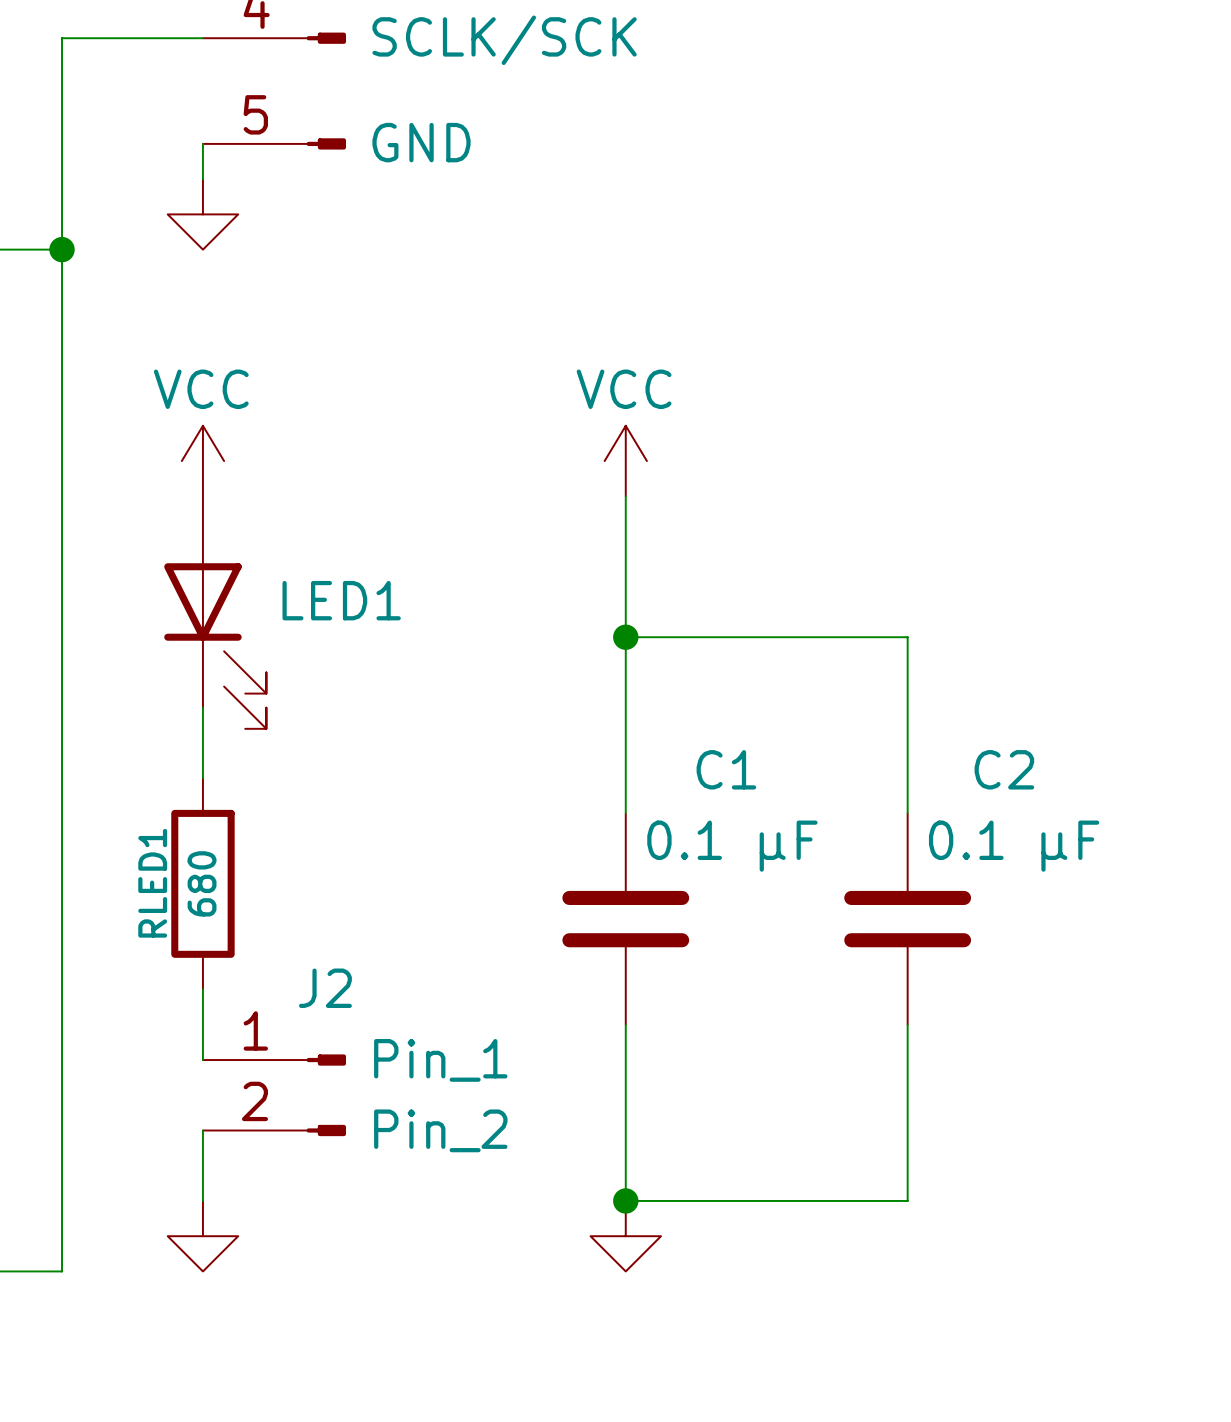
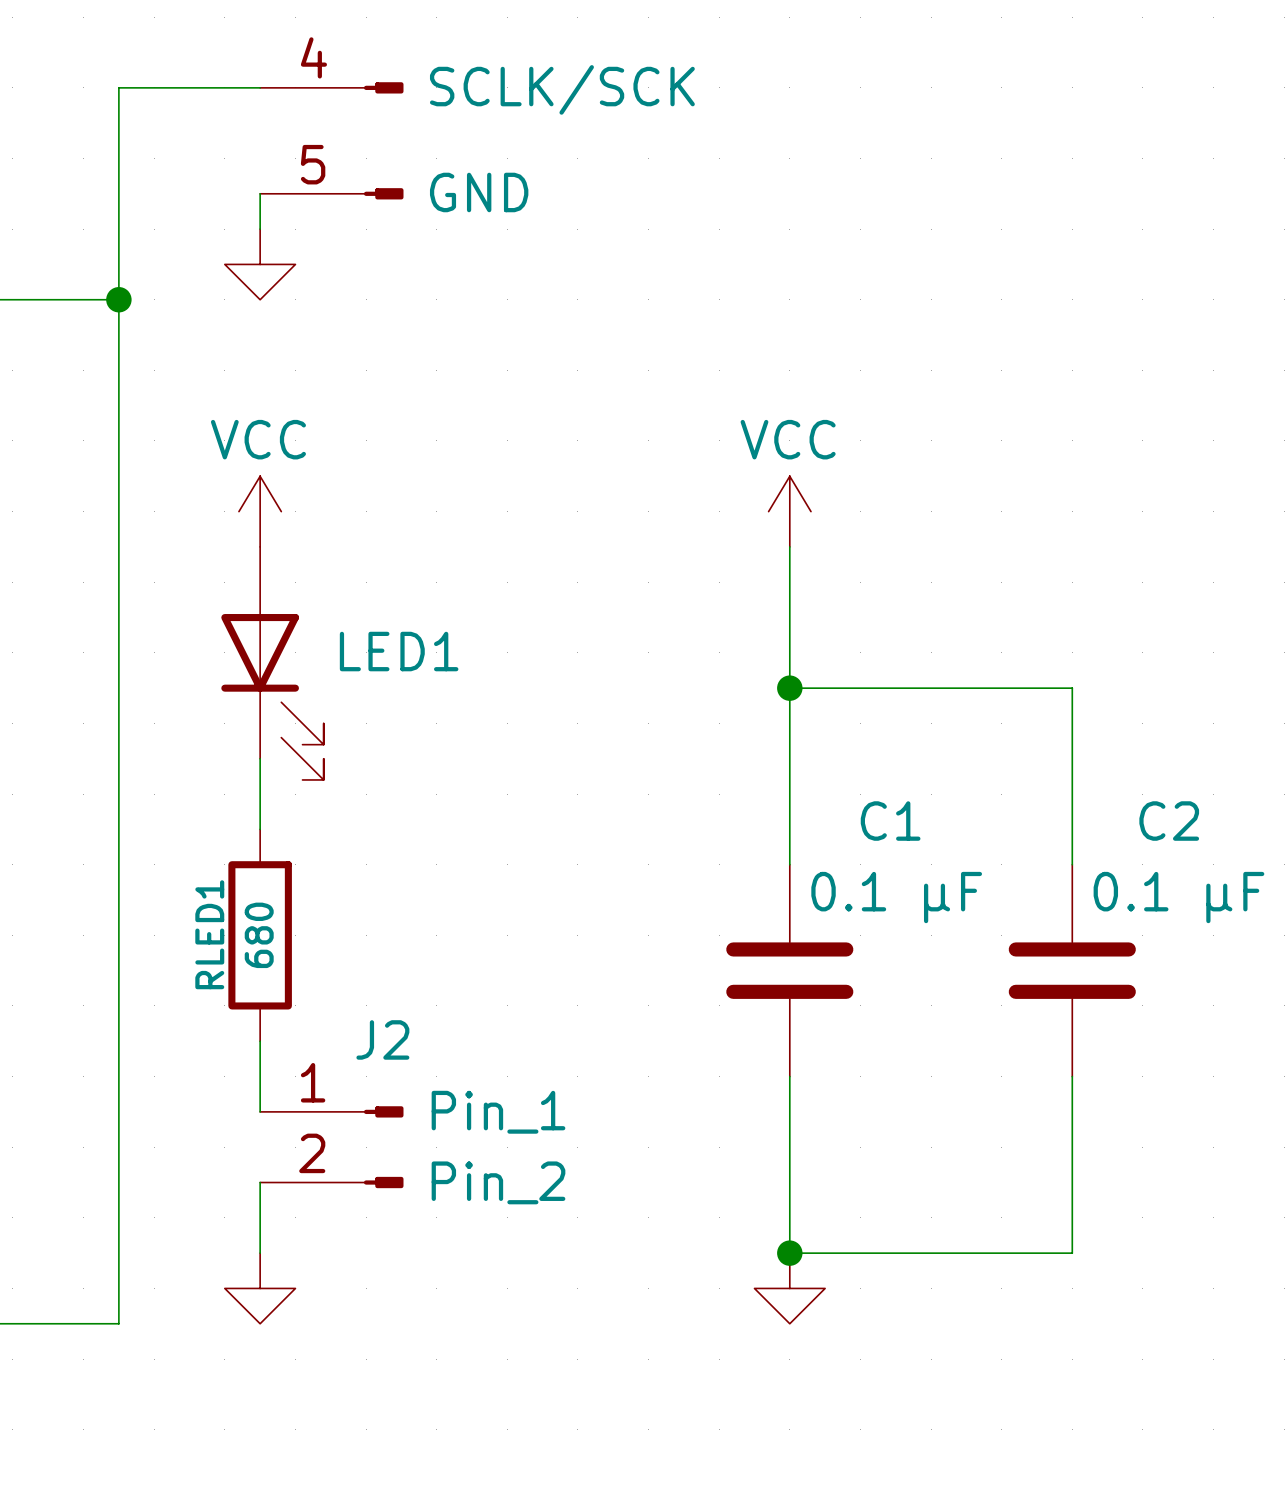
power symbol position: VCC (625, 461) -> VCC (789, 511)
wire: (625, 496) (625, 813) -> (789, 546) (789, 864)
wire: (625, 637) (731, 637) -> none
junction position: (625, 637) -> (789, 688)
wire: (907, 637) (907, 813) -> (966, 688) (1072, 688) (1072, 864)
C1 position: (625, 919) -> (789, 970)
C2 position: (907, 919) -> (1072, 970)
wire: (625, 1024) (625, 1200) (731, 1200) -> (789, 1076) (789, 1253)
wire: (907, 1024) (907, 1200) -> (1072, 1076) (1072, 1253) (966, 1253)
junction position: (625, 1200) -> (789, 1253)
power symbol position: (625, 1236) -> (789, 1288)

